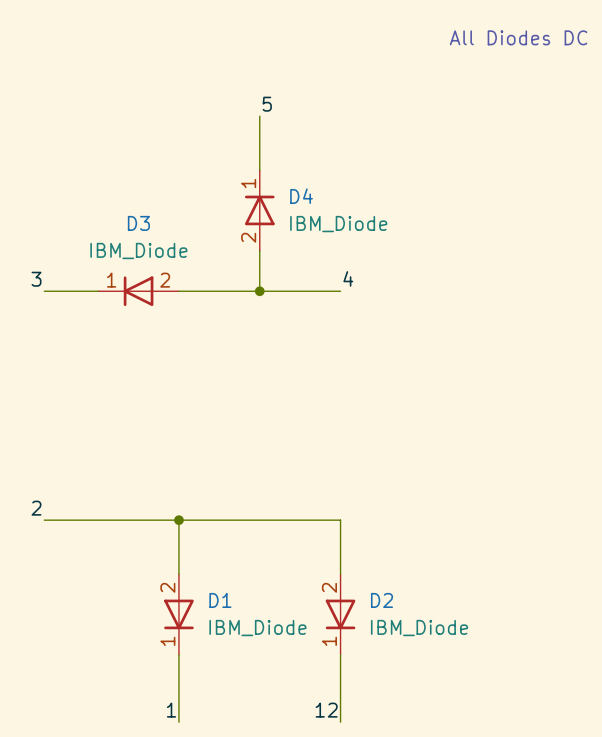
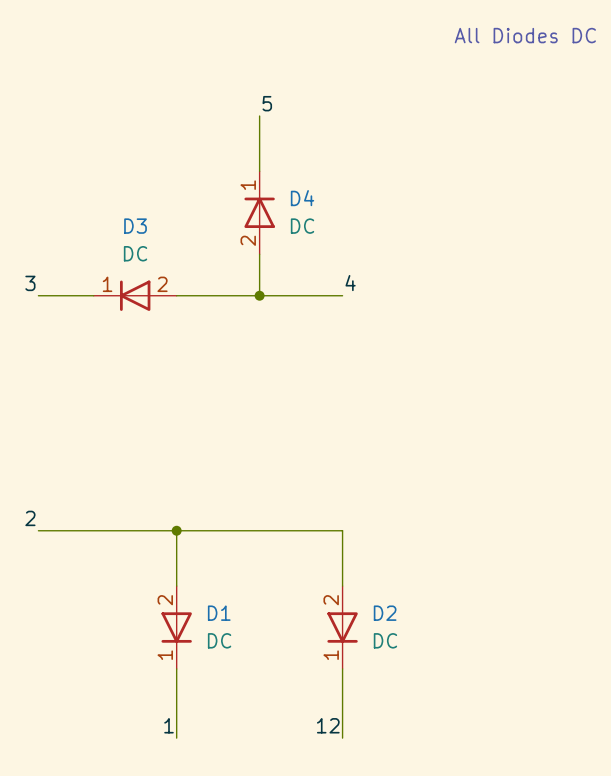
D4 value: IBM_Diode (338, 224) -> DC (302, 226)
D3 value: IBM_Diode (138, 250) -> DC (135, 253)
D1 value: IBM_Diode (257, 628) -> DC (219, 640)
D2 value: IBM_Diode (419, 628) -> DC (385, 640)

